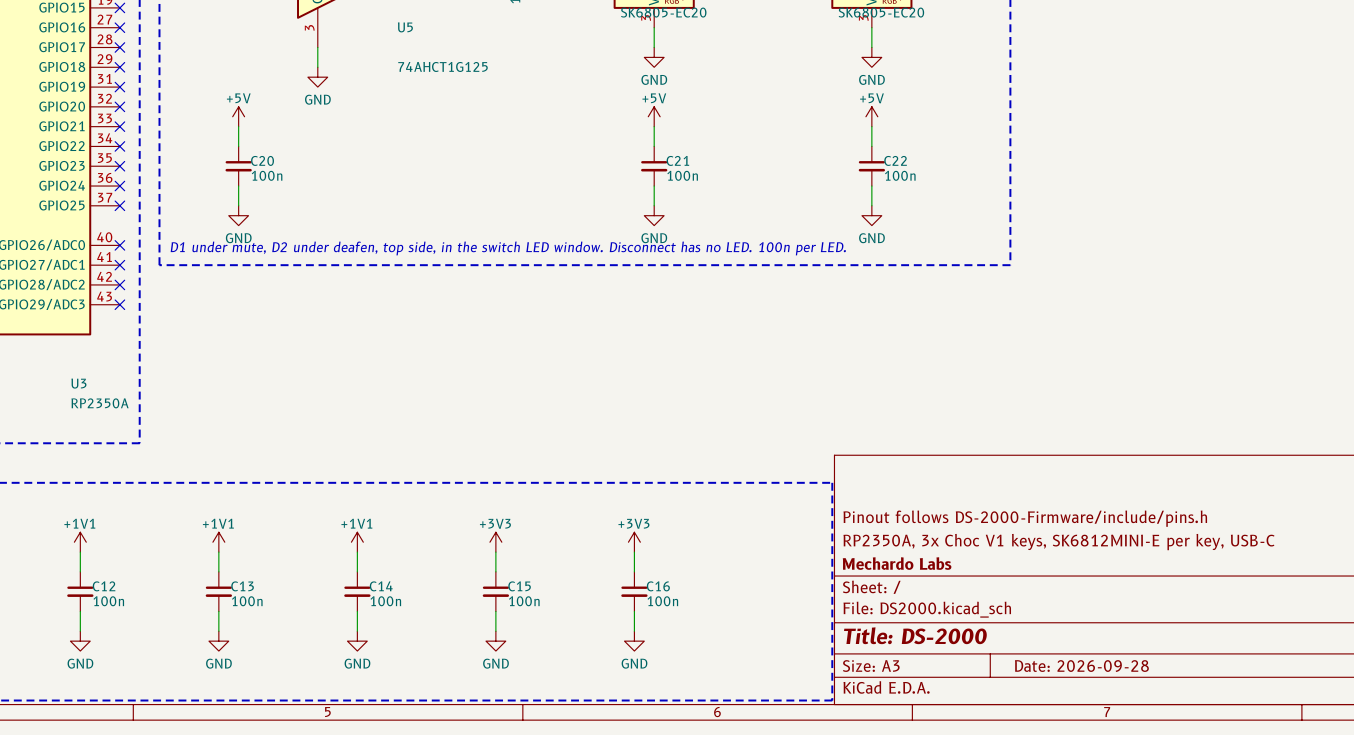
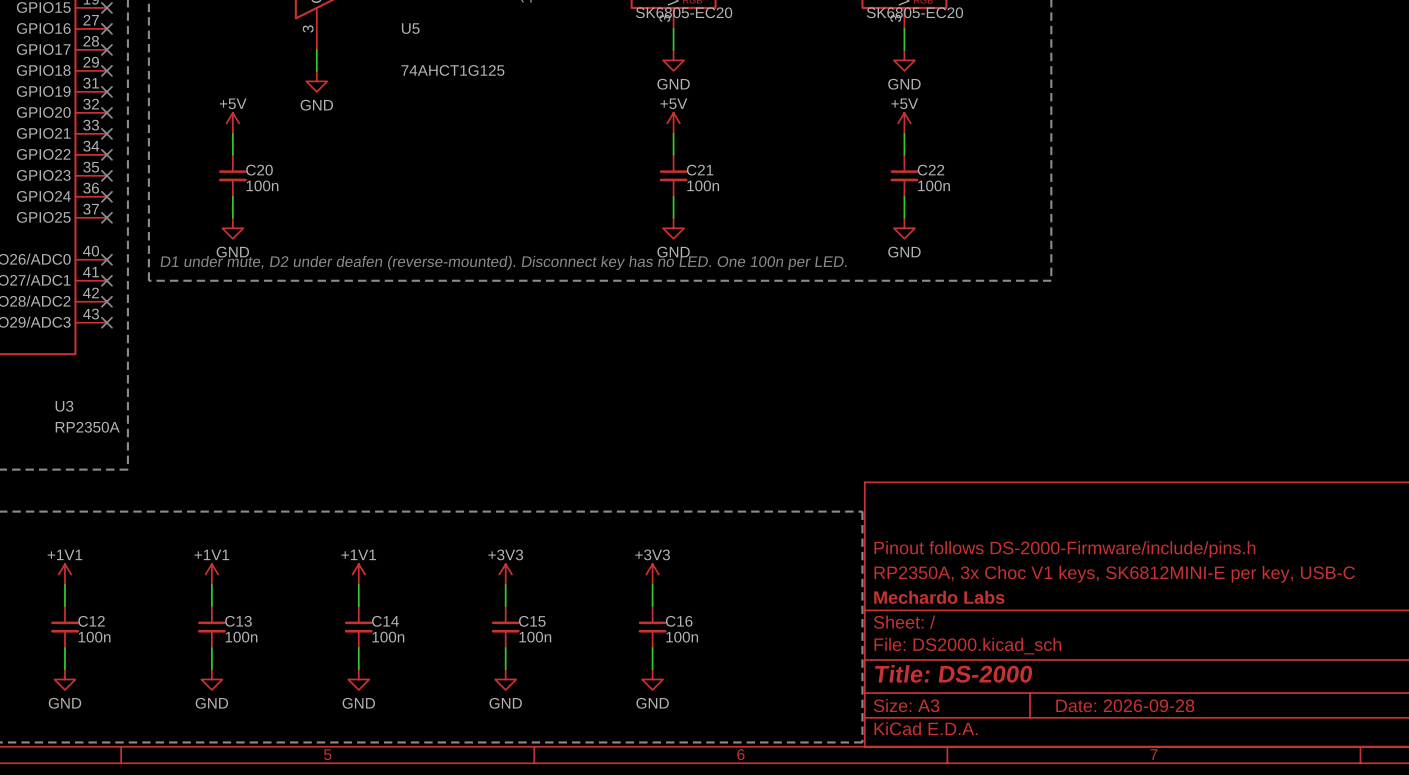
text: D1 under mute, D2 under deafen, top side, in the switch LED window. Disconnect has no LED. 100n per LED. (508, 248) -> D1 under mute, D2 under deafen (reverse-mounted). Disconnect key has no LED. One 100n per LED. (503, 262)

